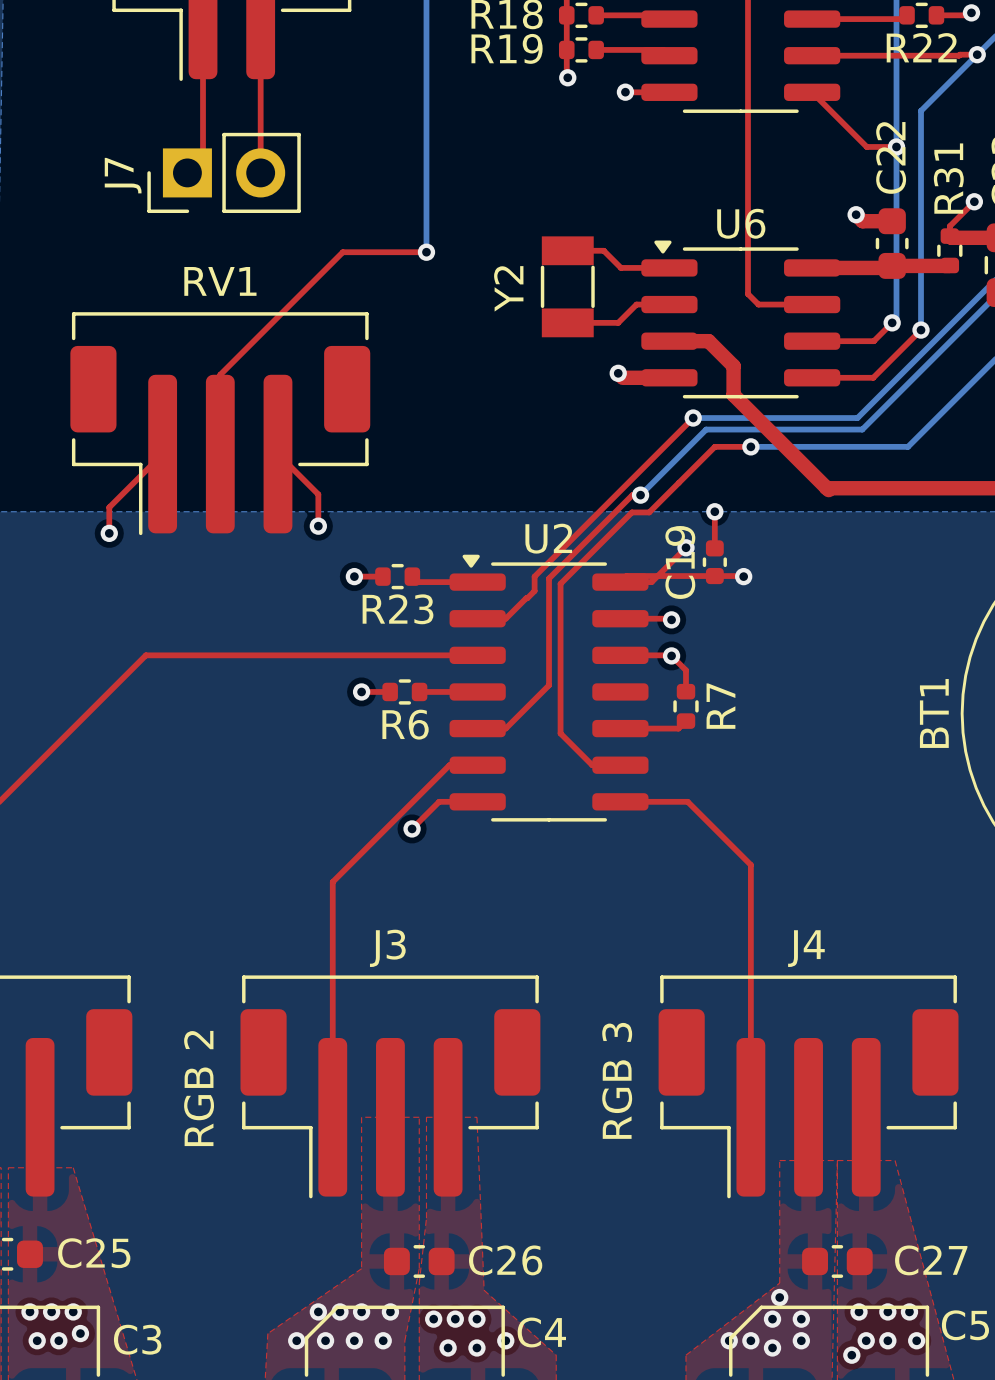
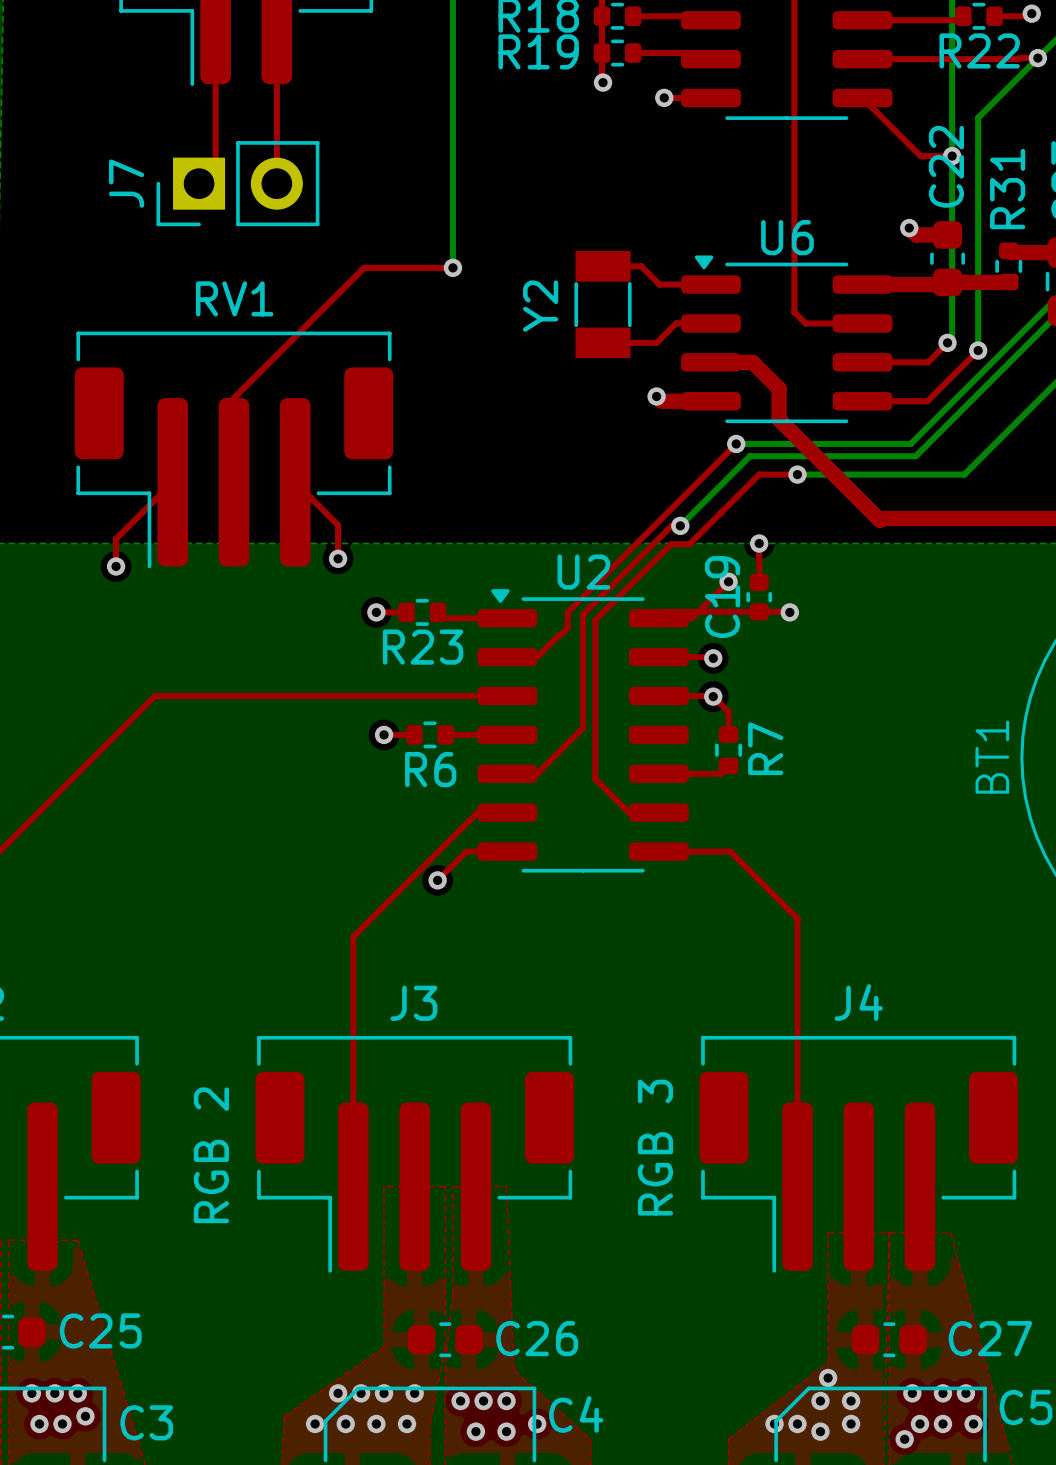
top track: (974, 201) (949, 226) (949, 236) -> none
via: (974, 201) -> none

